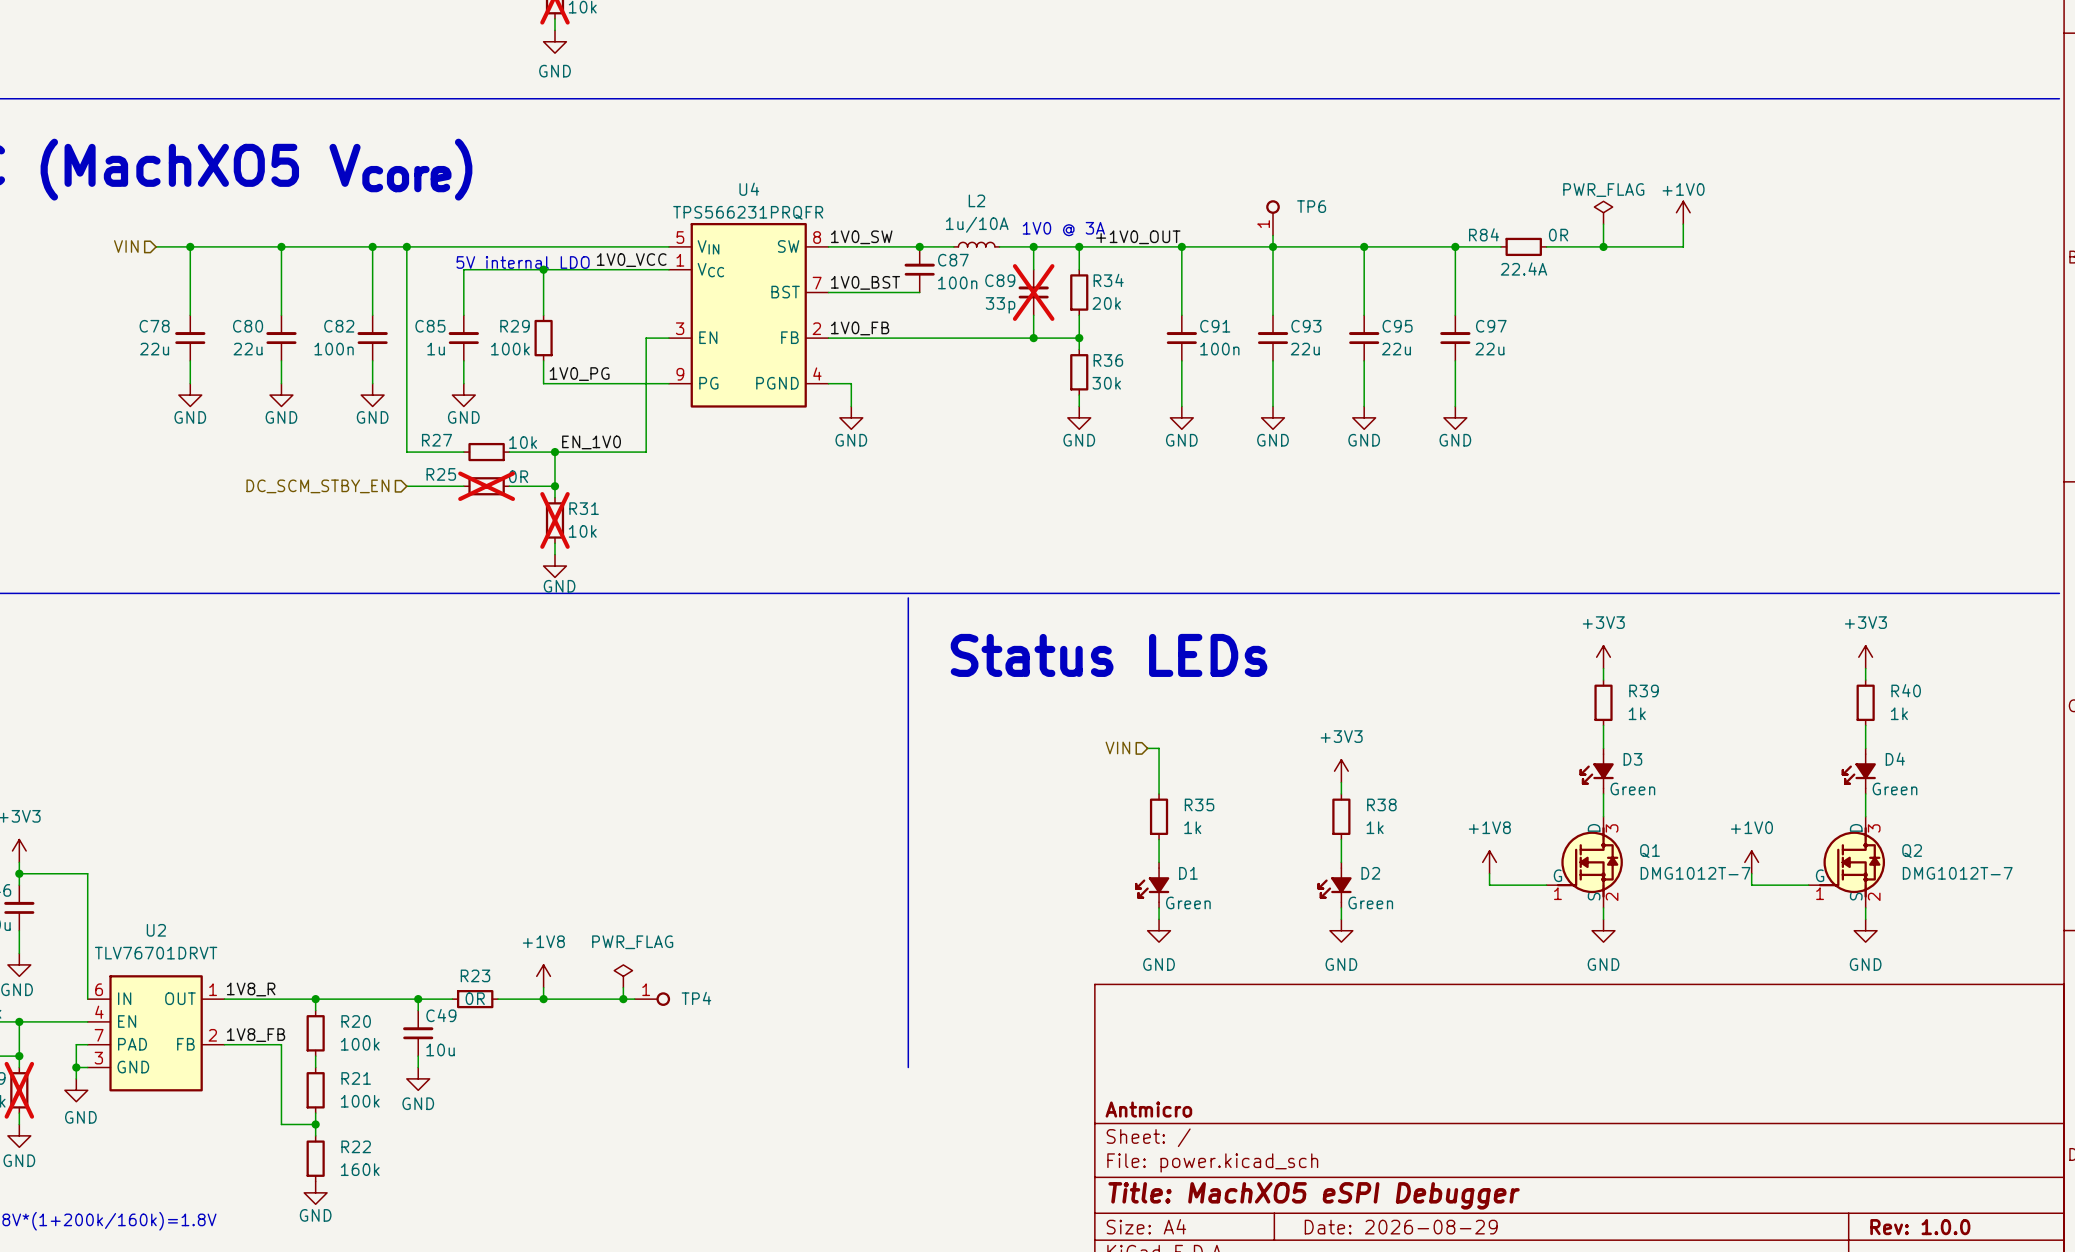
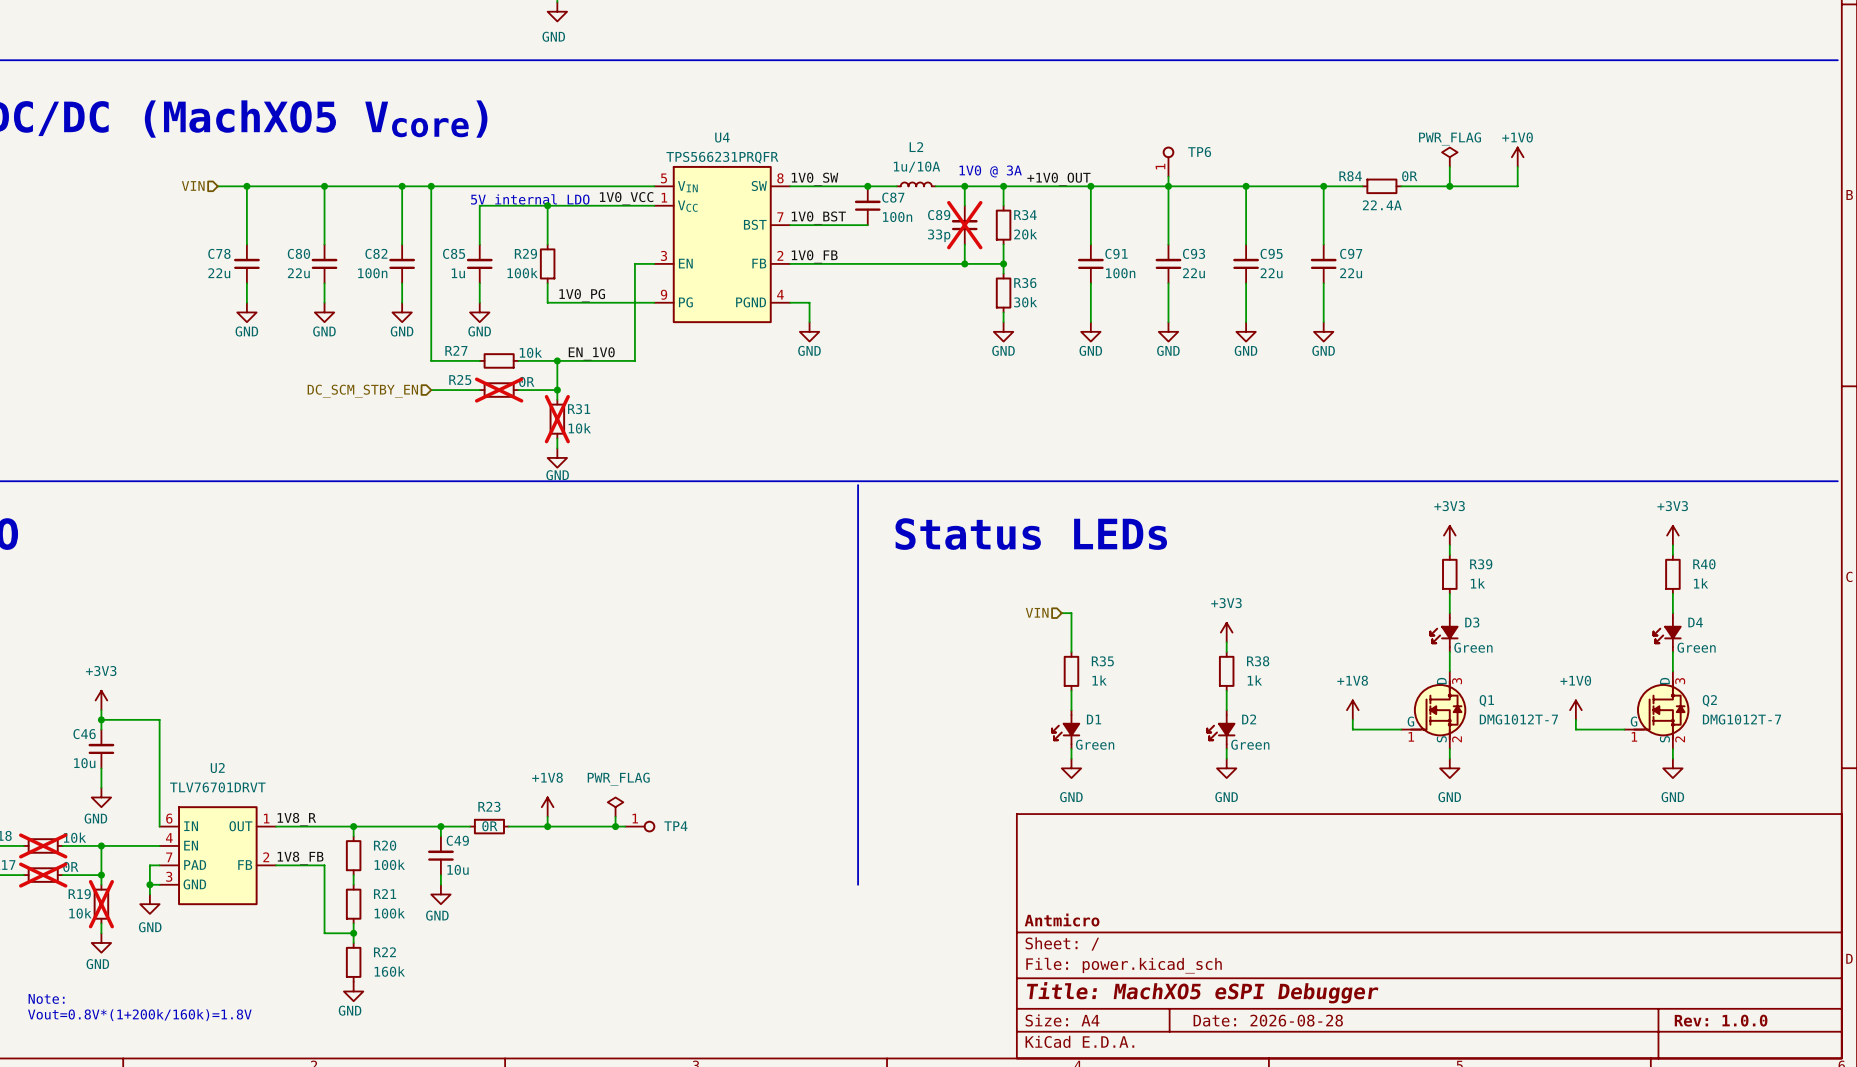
title block: Date: 2026-08-29 (1401, 1227) -> Date: 2026-08-28 (1268, 1020)

